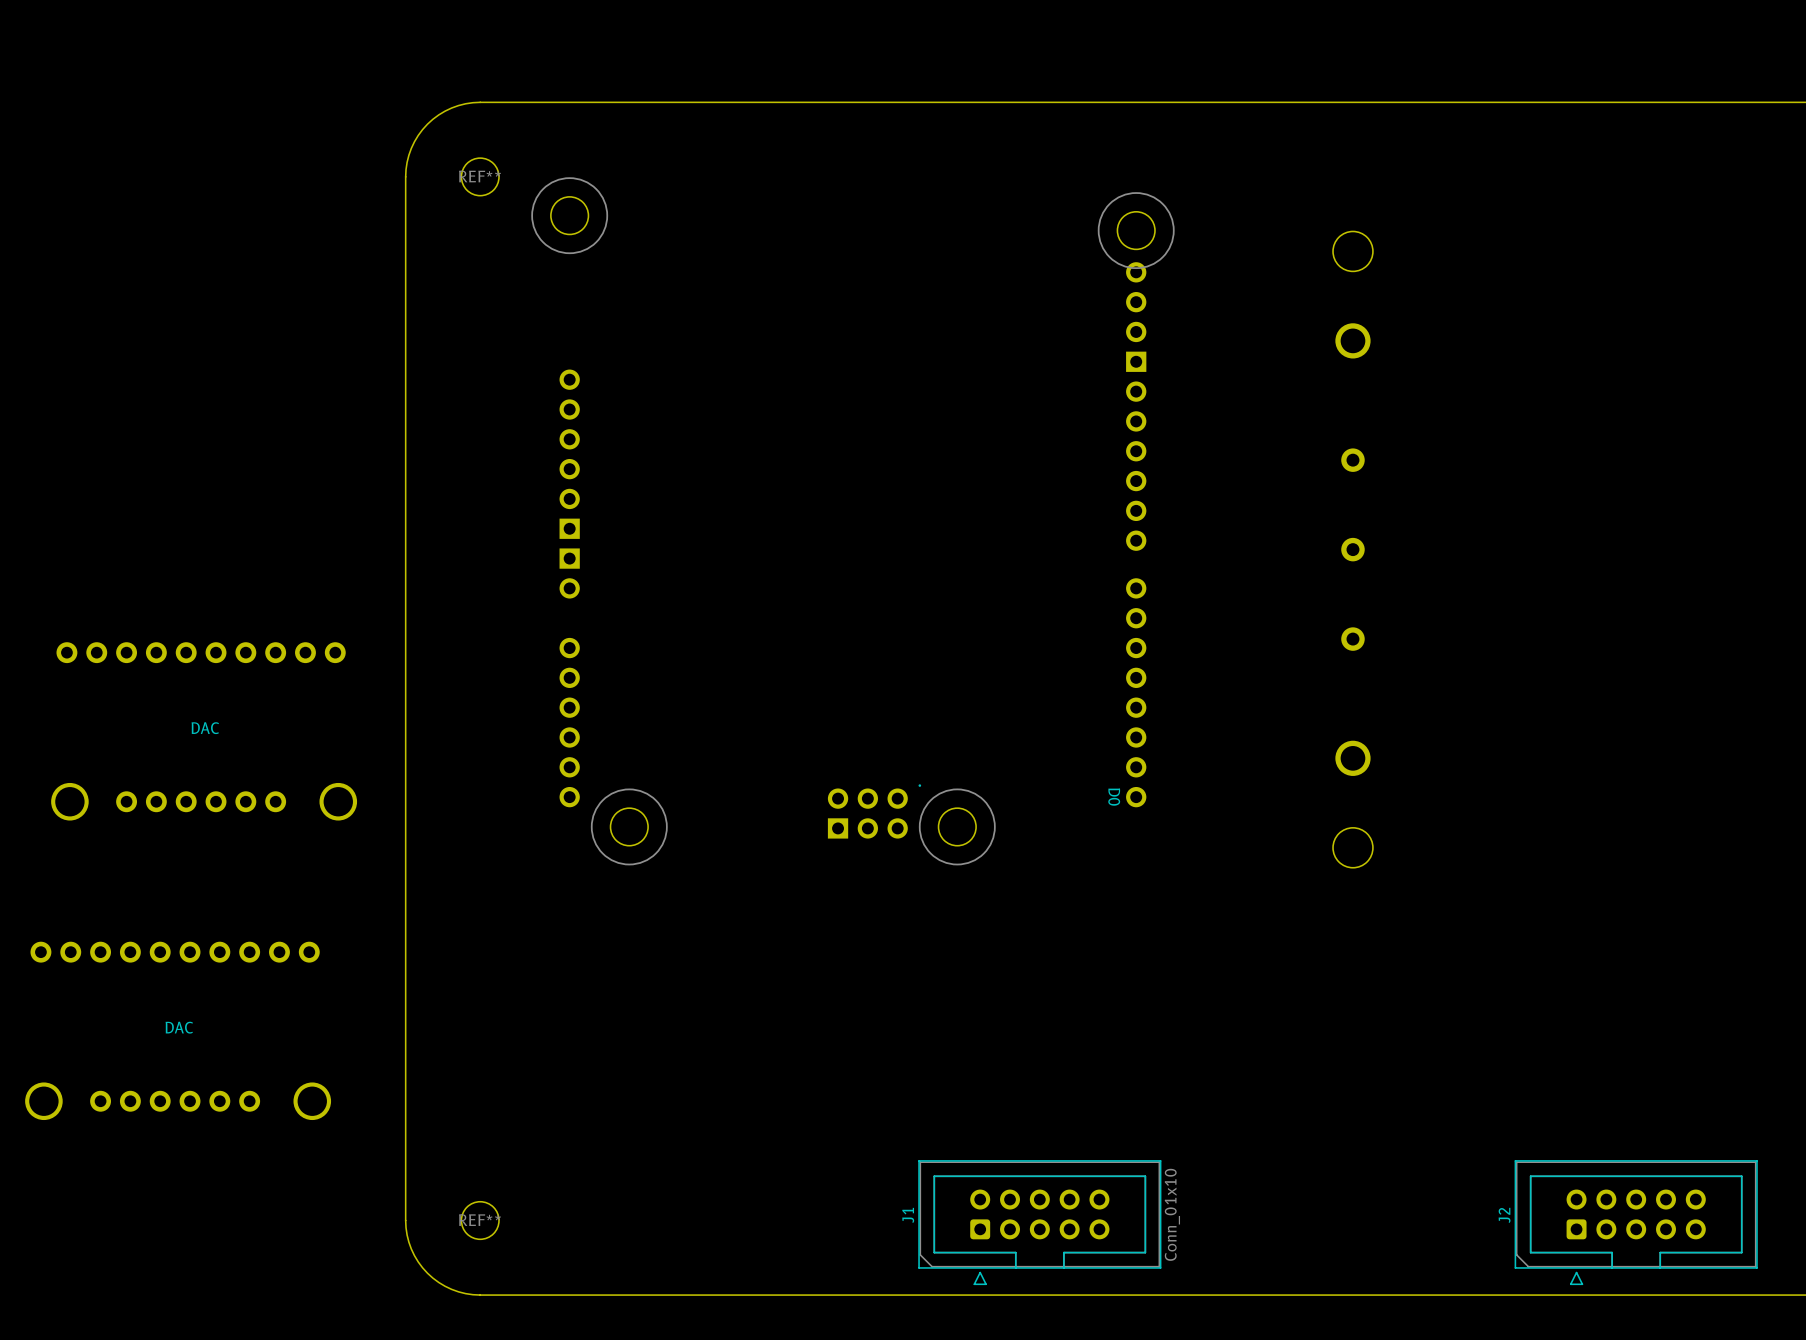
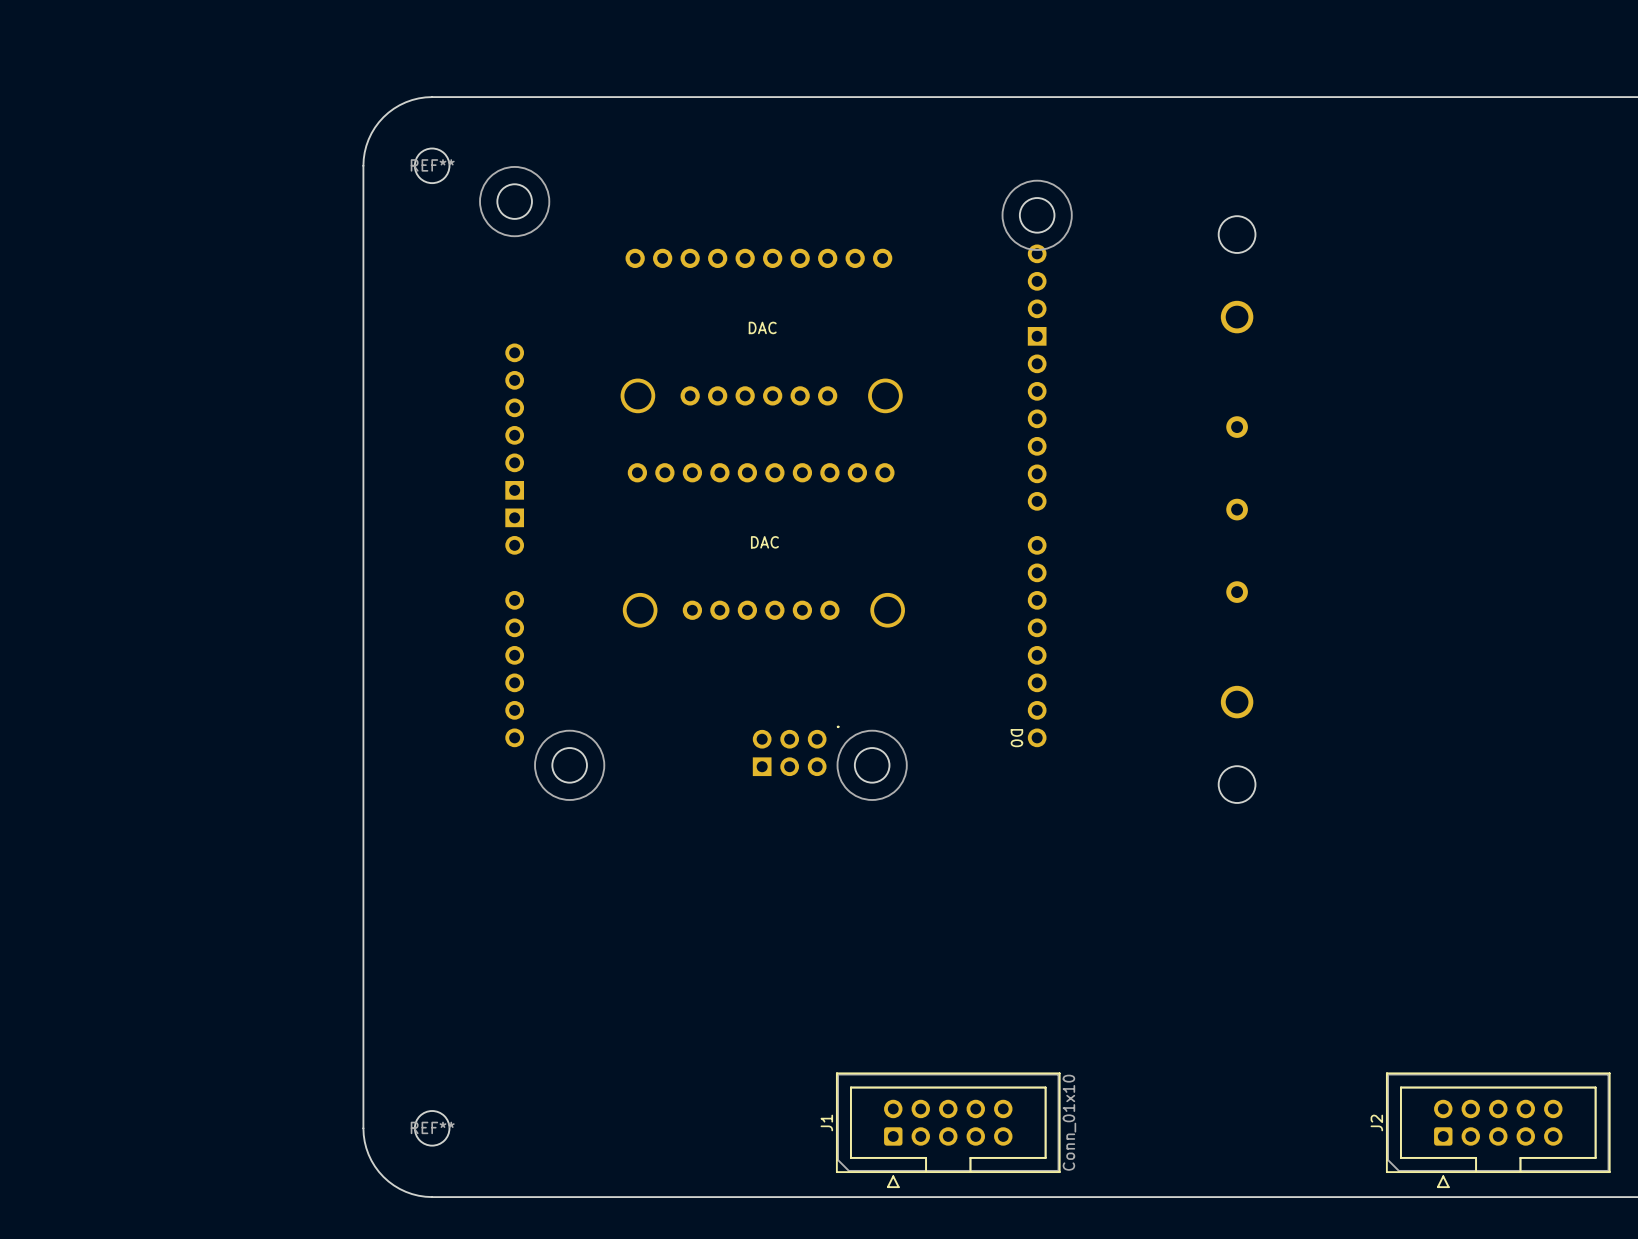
part: none -> DAC (761, 330)
part: none -> DAC (763, 545)
part: DAC (204, 731) -> none
part: DAC (178, 1030) -> none

